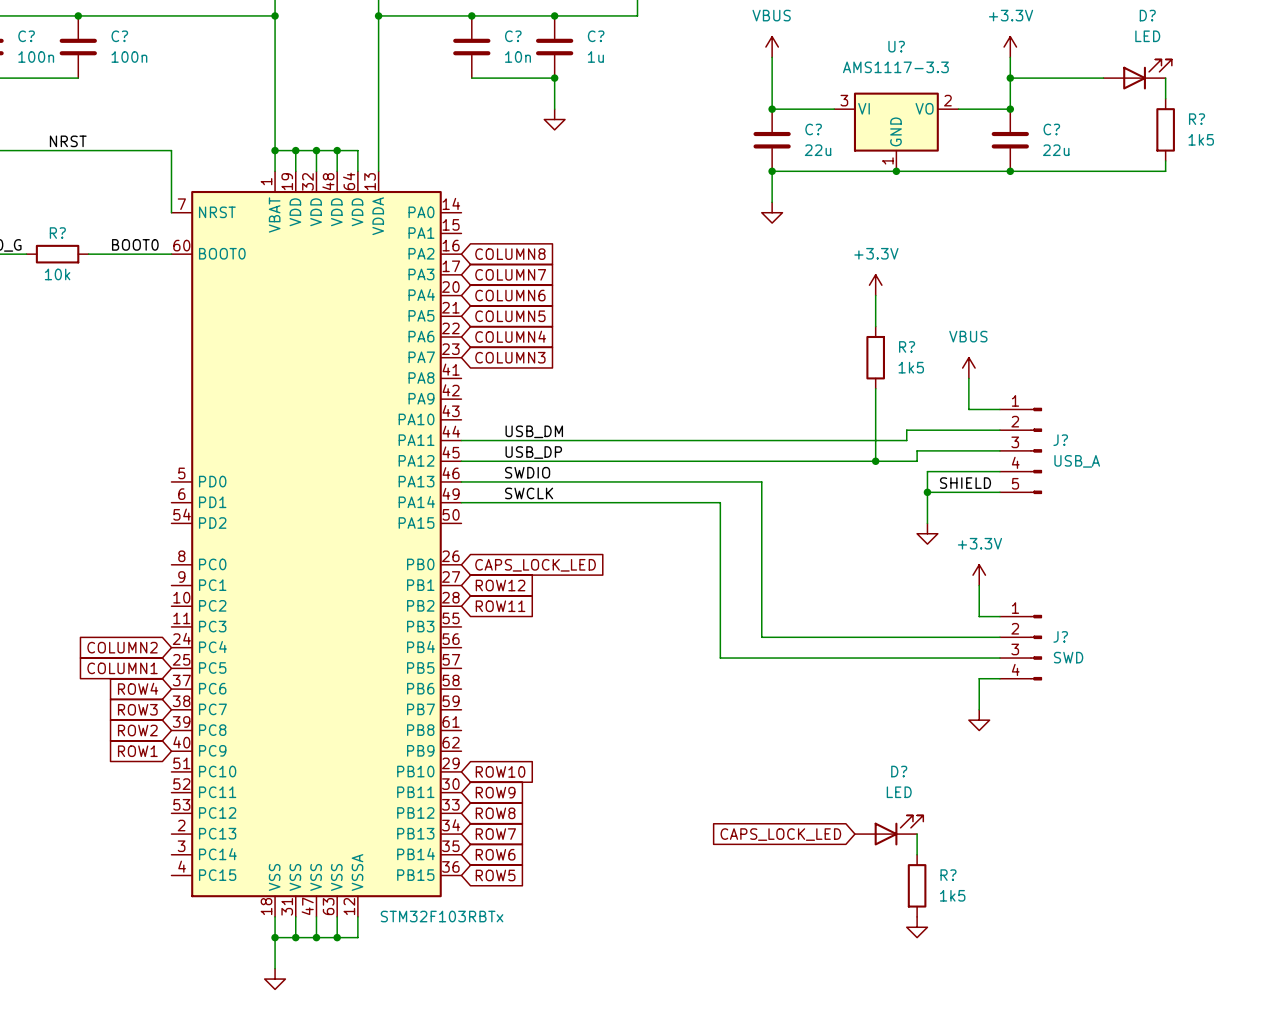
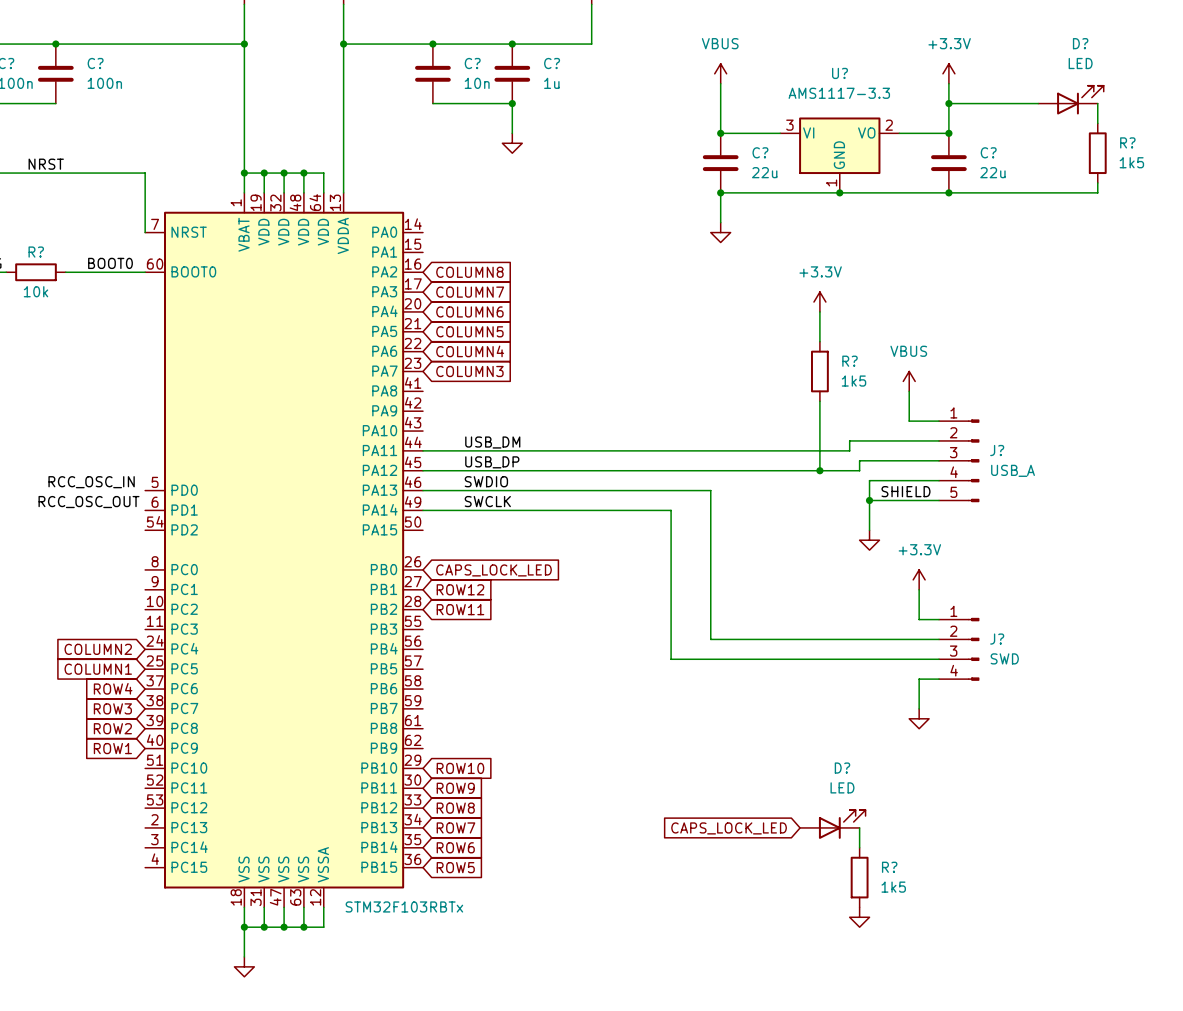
label: none -> RCC_OSC_IN (91, 482)
label: none -> RCC_OSC_OUT (88, 502)

